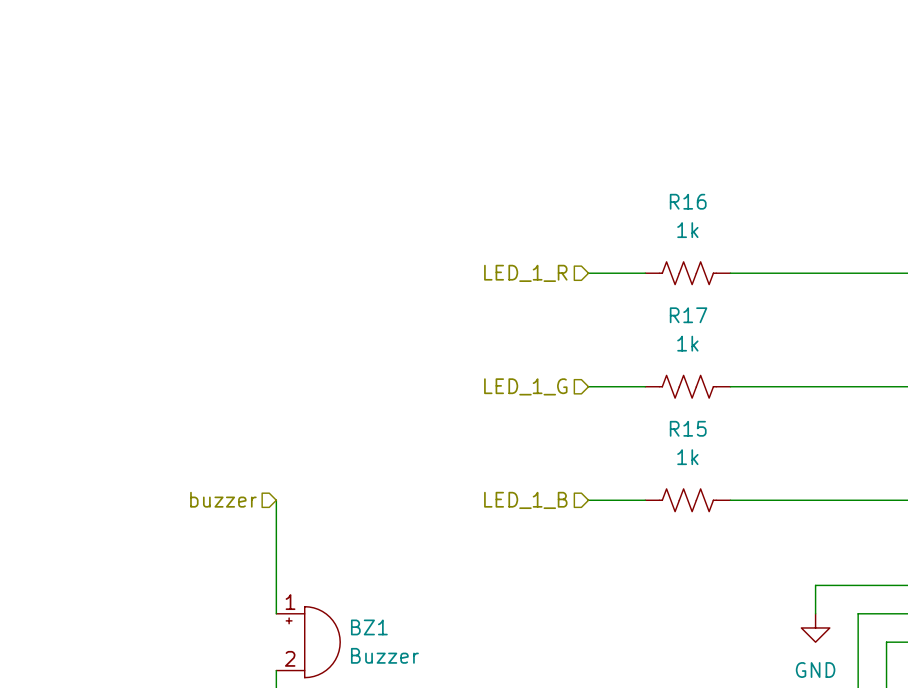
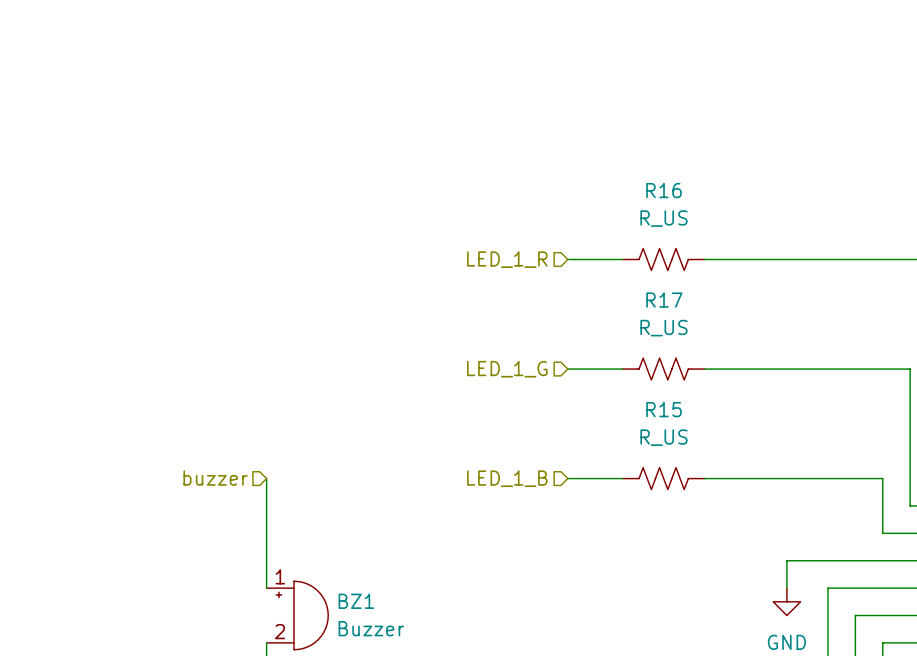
R16 value: 1k (687, 230) -> R_US (664, 218)
R17 value: 1k (687, 343) -> R_US (664, 328)
R15 value: 1k (687, 457) -> R_US (664, 437)

